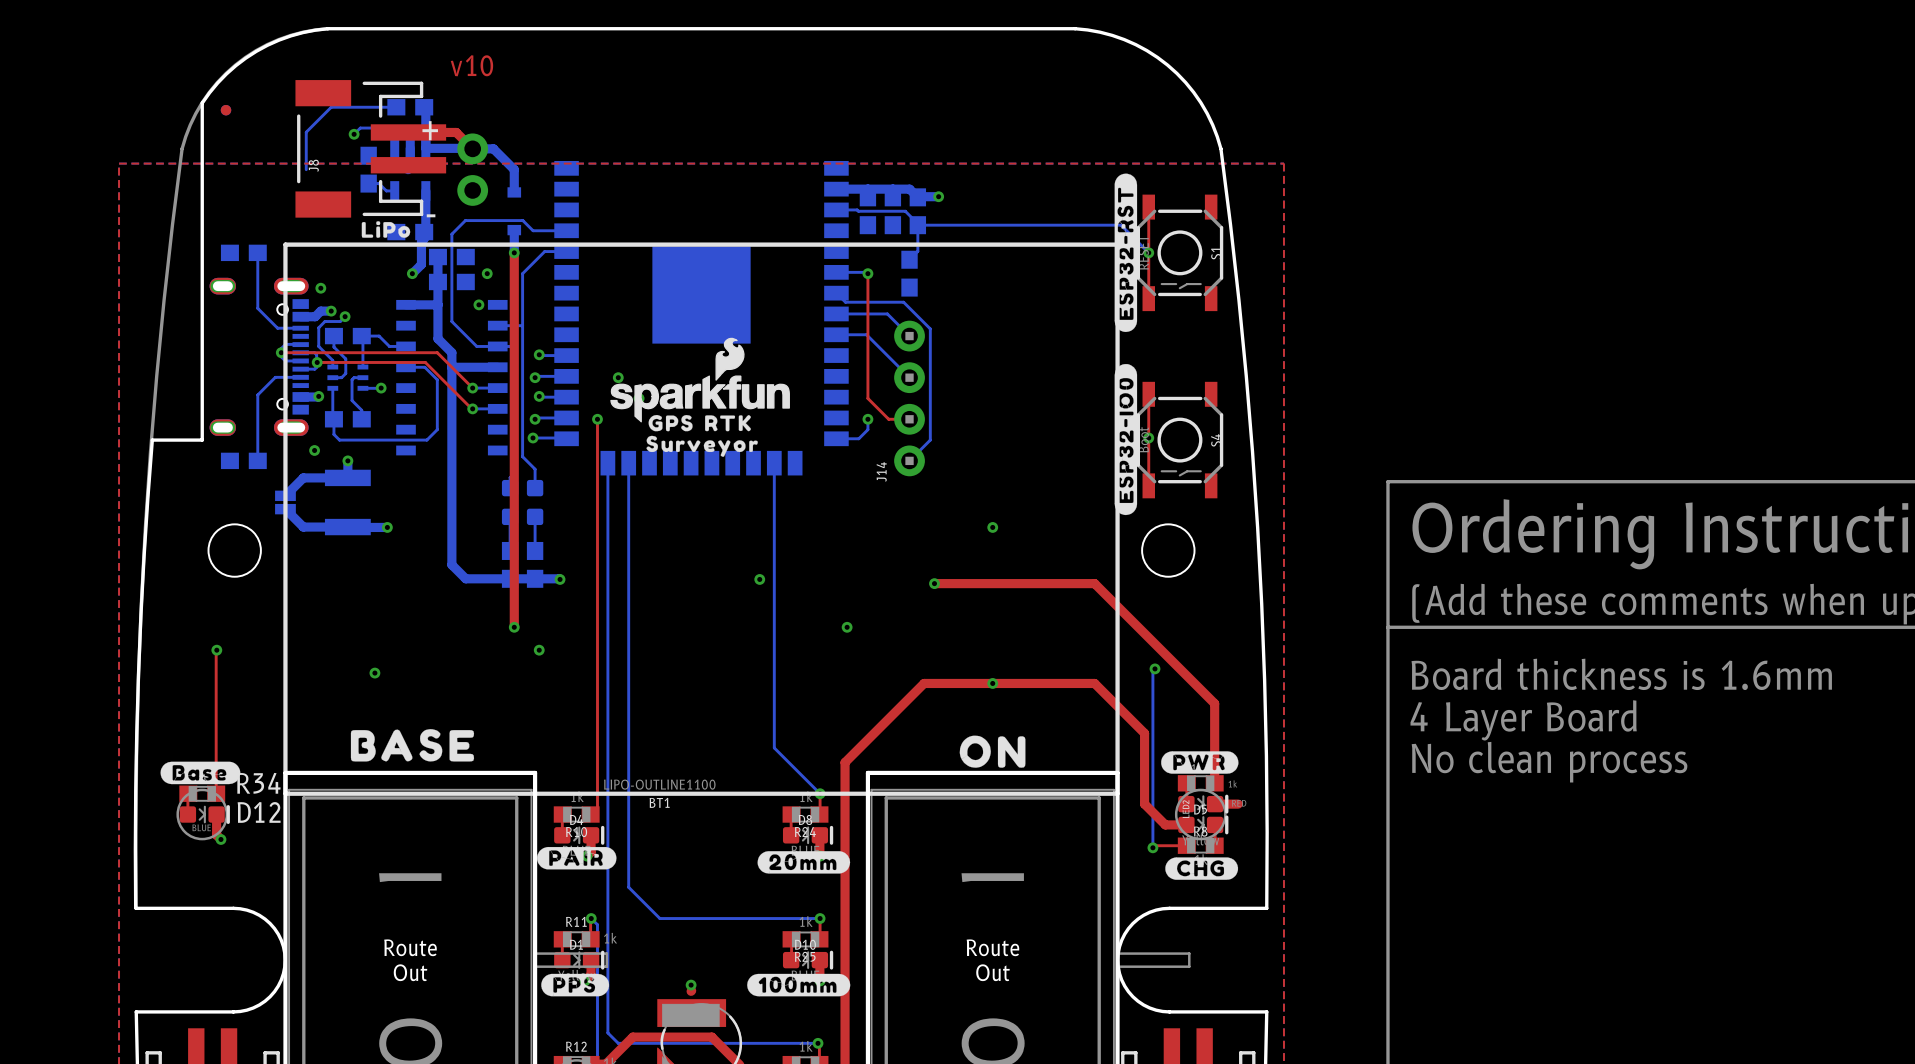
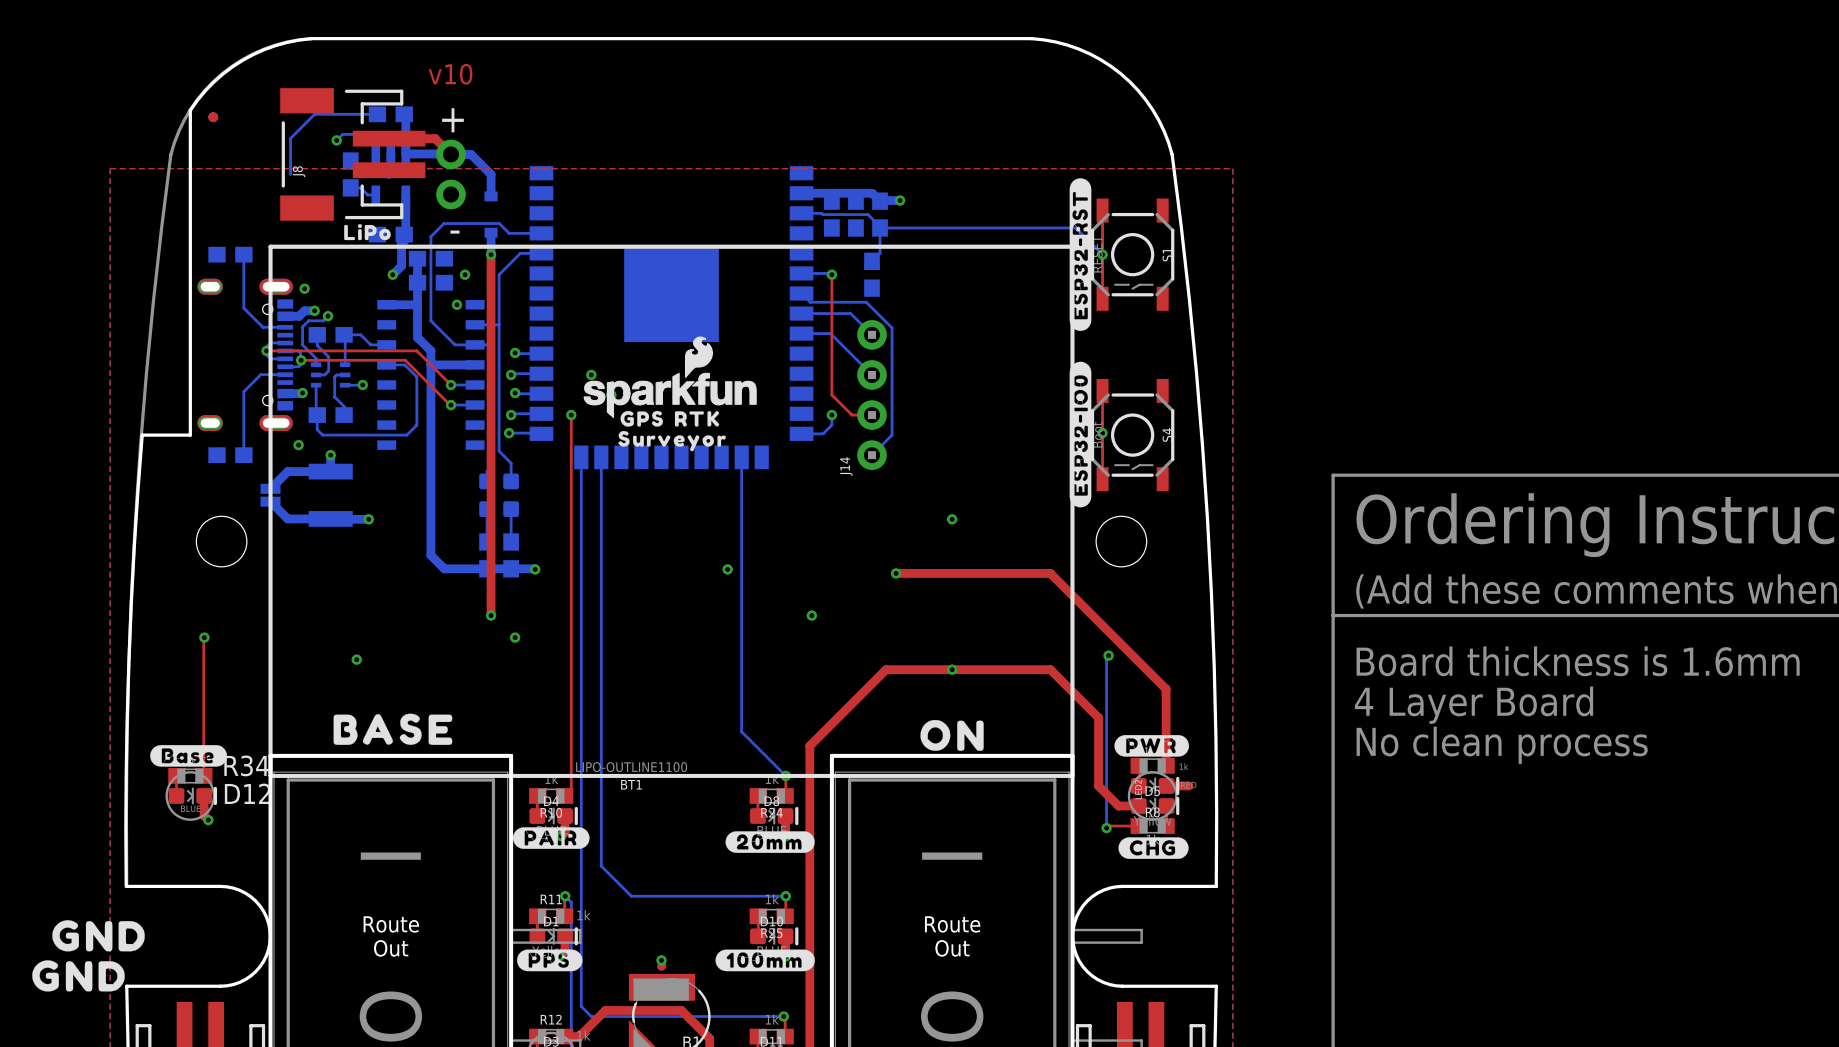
text position: + (430, 130) -> + (452, 120)
text position: - (431, 215) -> - (454, 232)
drawing: none -> [32, 920, 145, 992]

